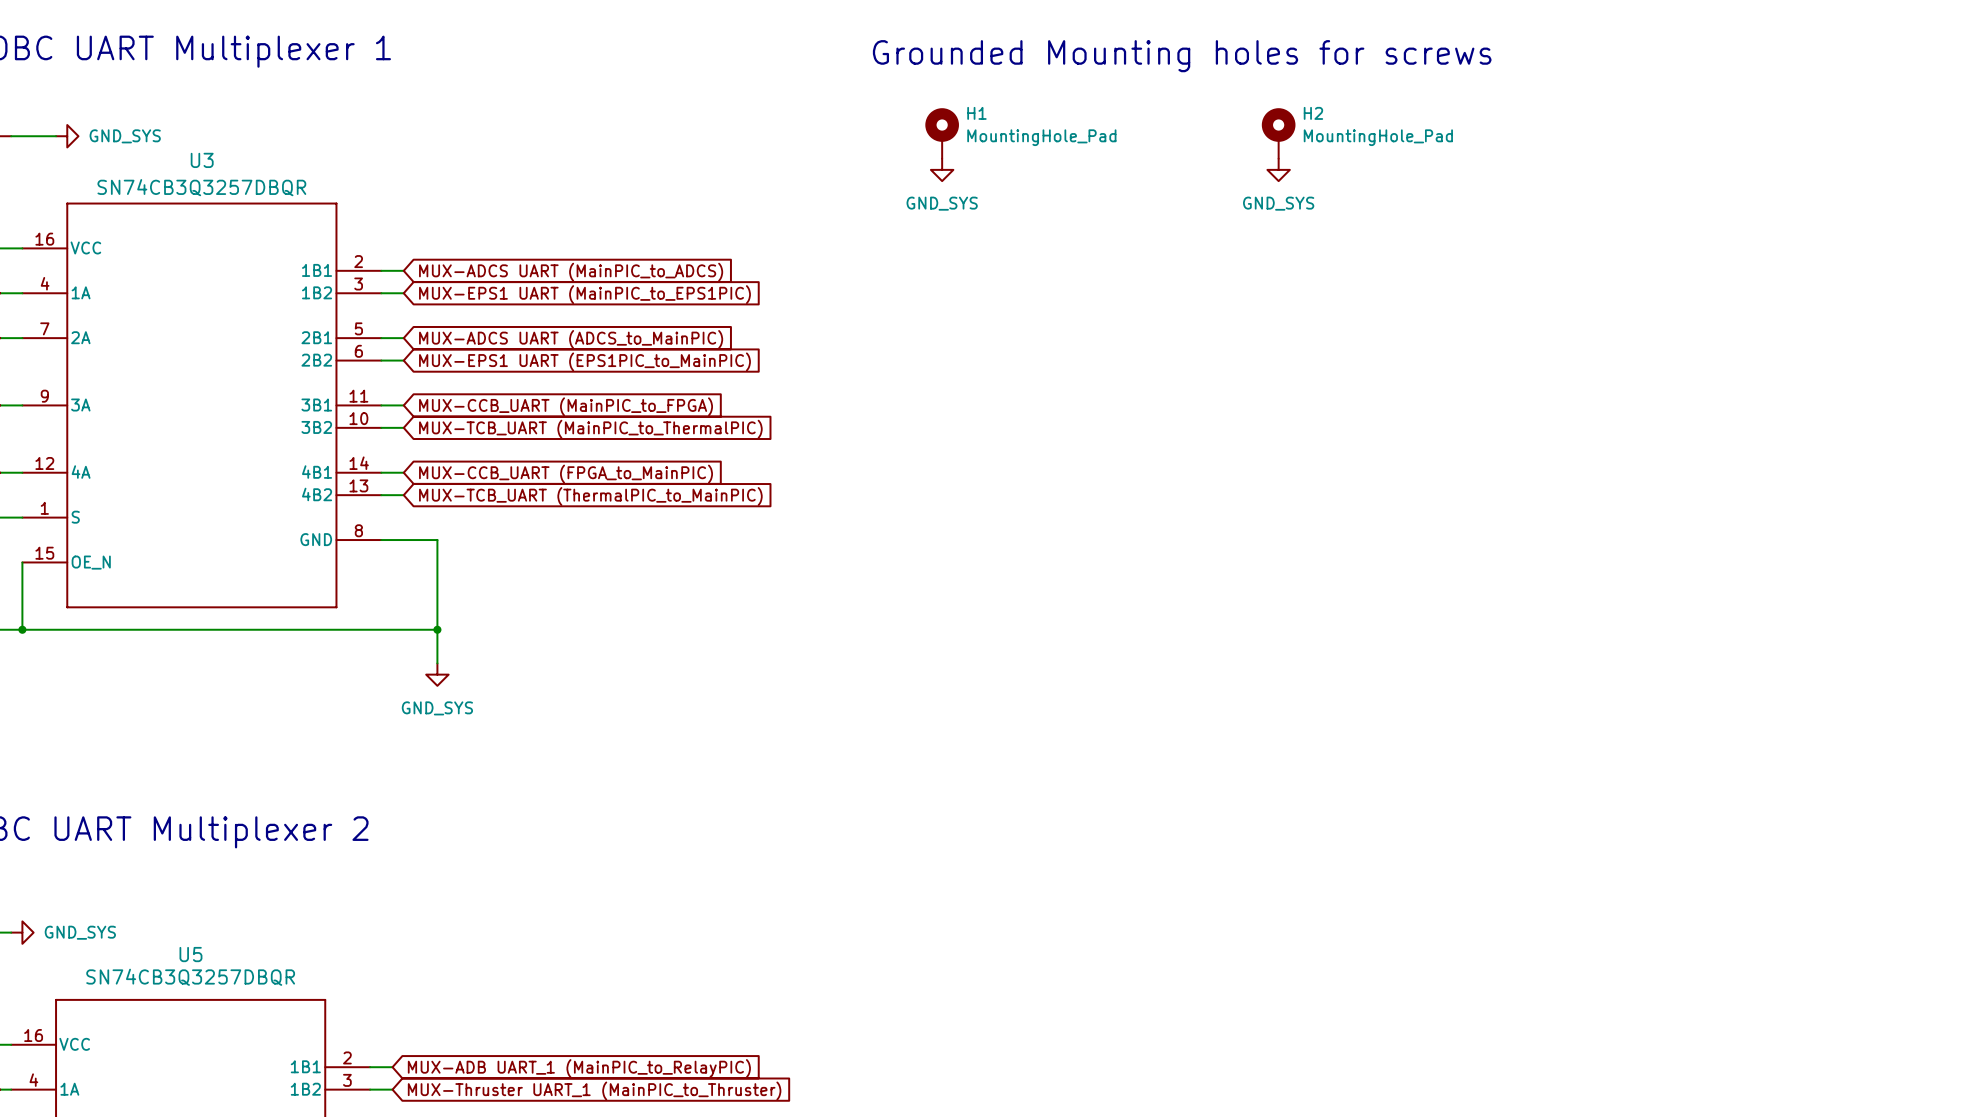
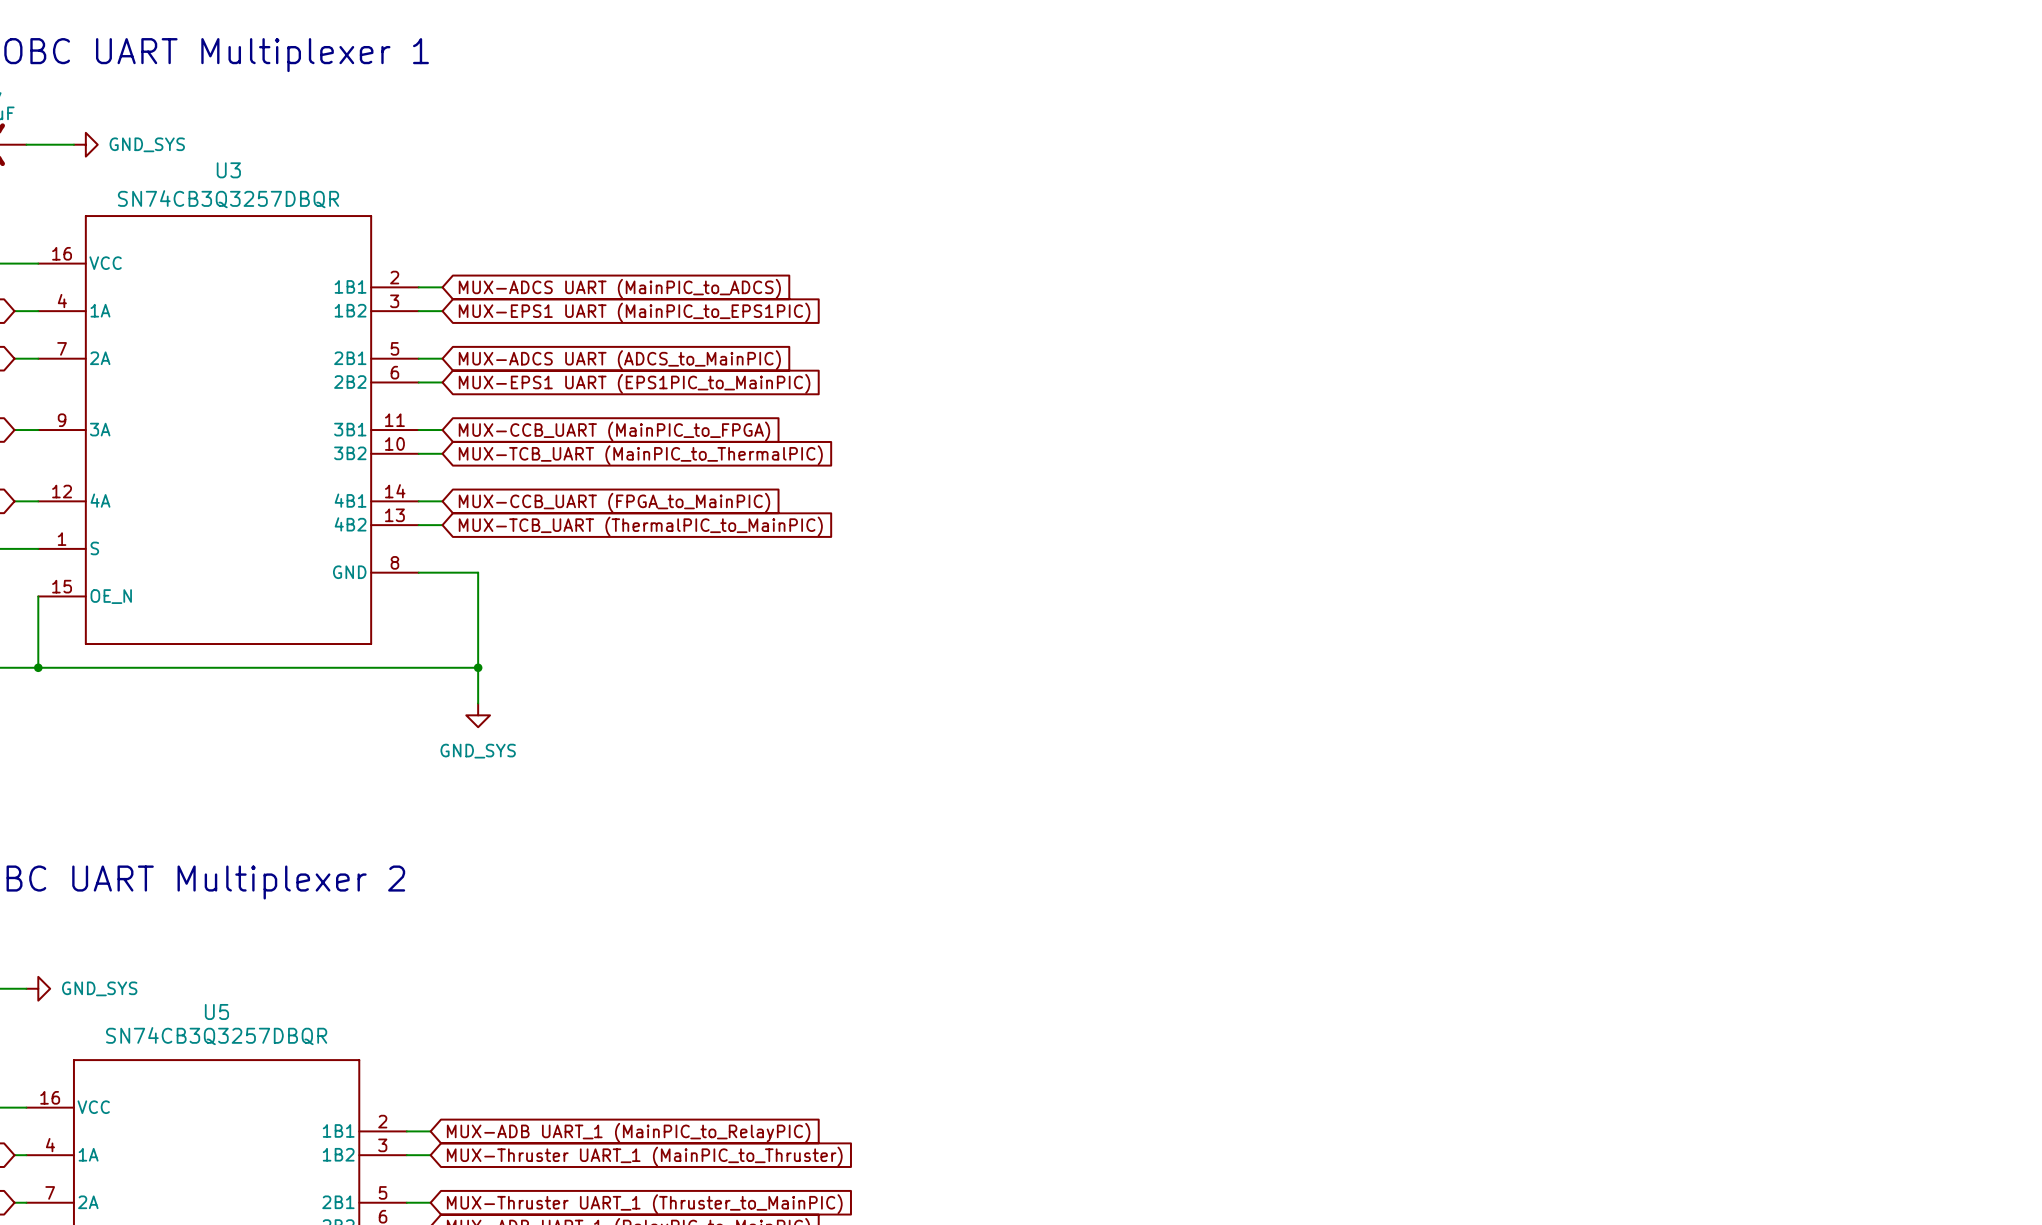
text: Grounded Mounting holes for screws (1182, 56) -> none
H1: MountingHole_Pad (942, 133) -> none
H2: MountingHole_Pad (1278, 133) -> none
power symbol: GND_SYS (942, 169) -> none
power symbol: GND_SYS (1278, 169) -> none

